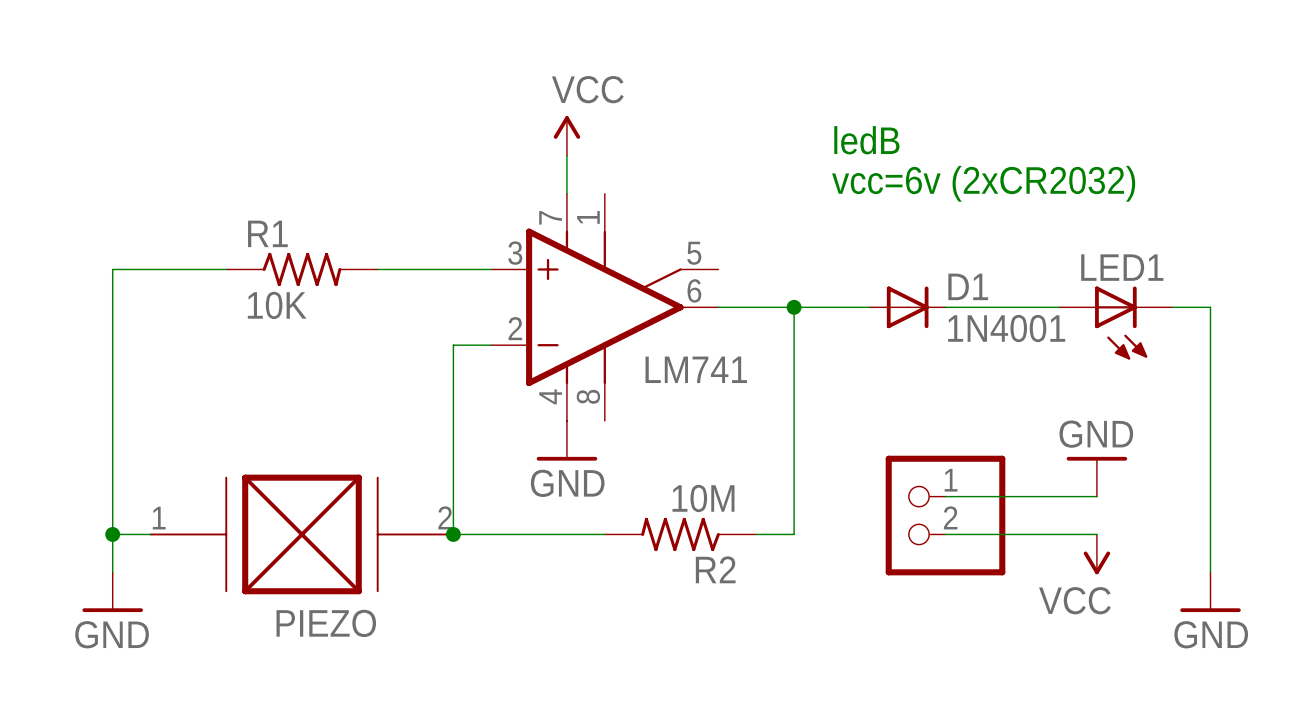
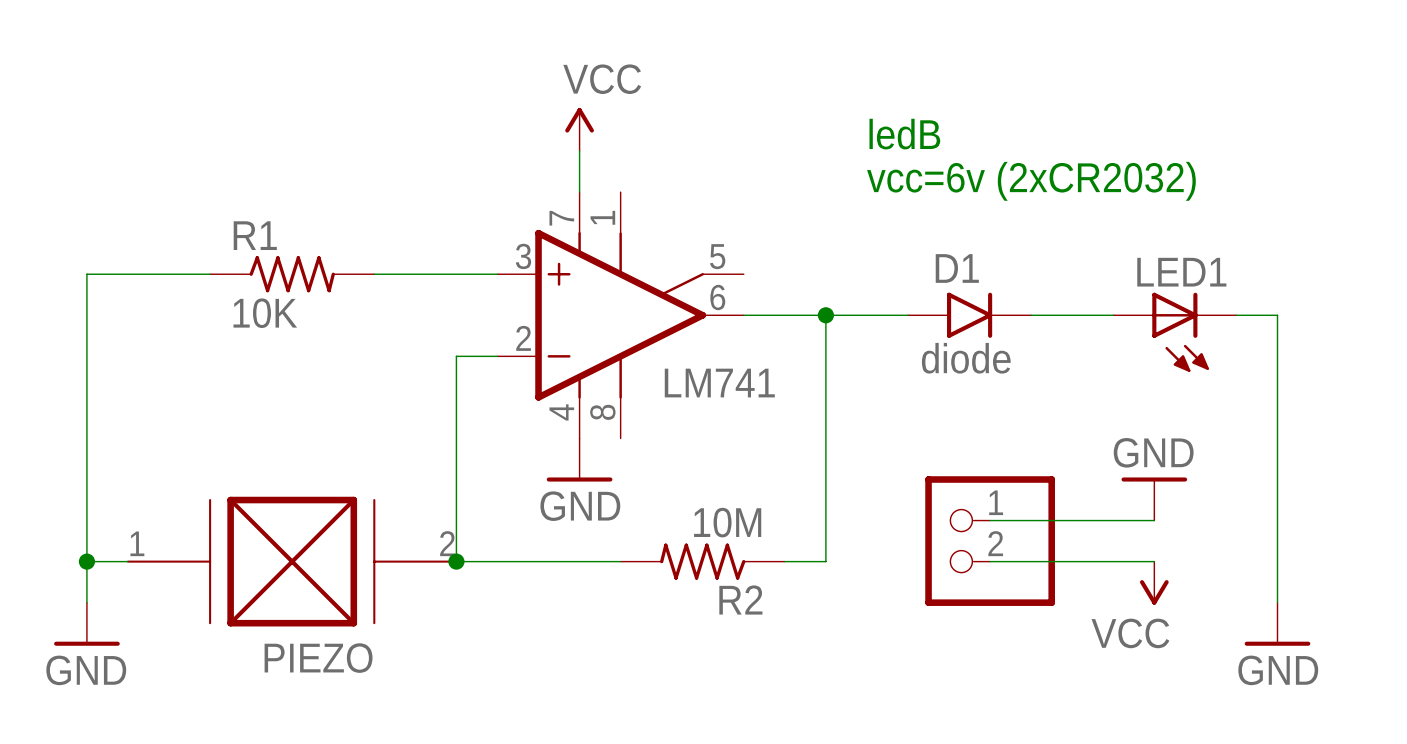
D1 symbol: [869, 286, 946, 329] -> [908, 292, 1032, 338]
D1 name position: D1 (968, 286) -> D1 (957, 268)
D1 value: 1N4001 (1006, 328) -> diode (966, 358)

